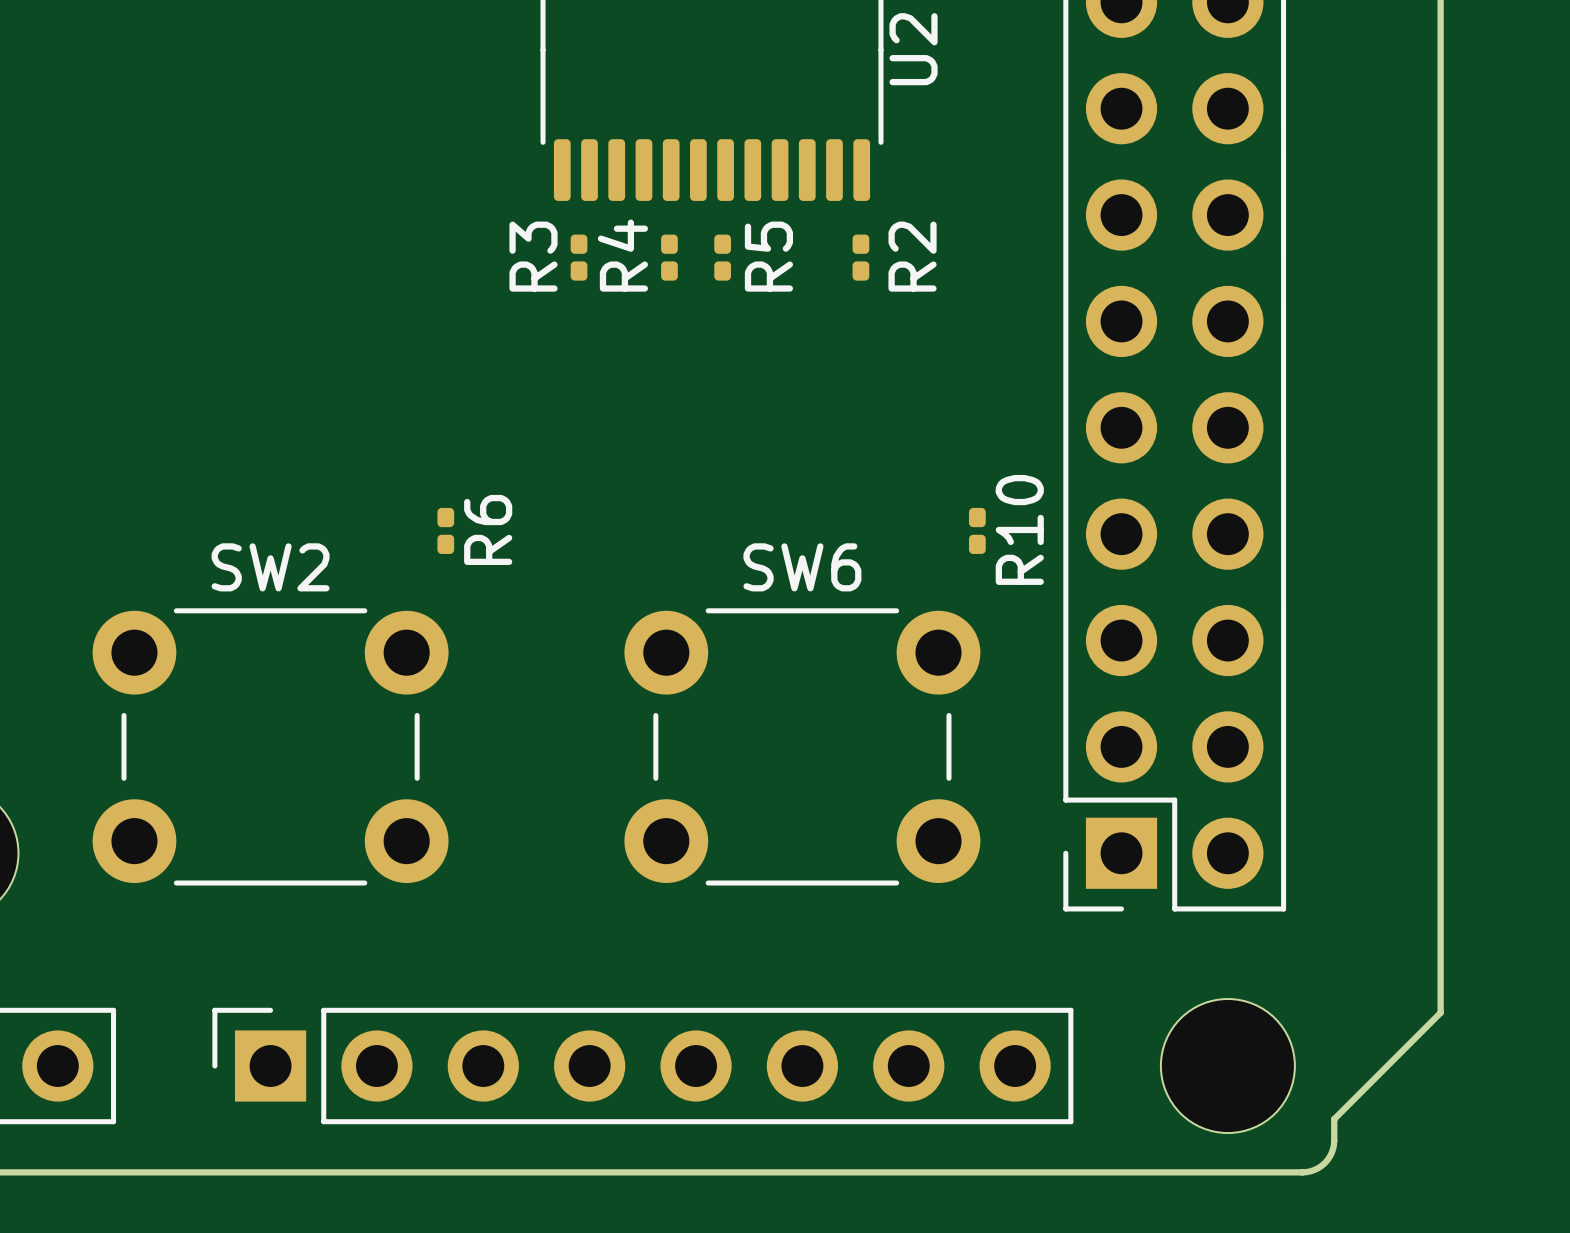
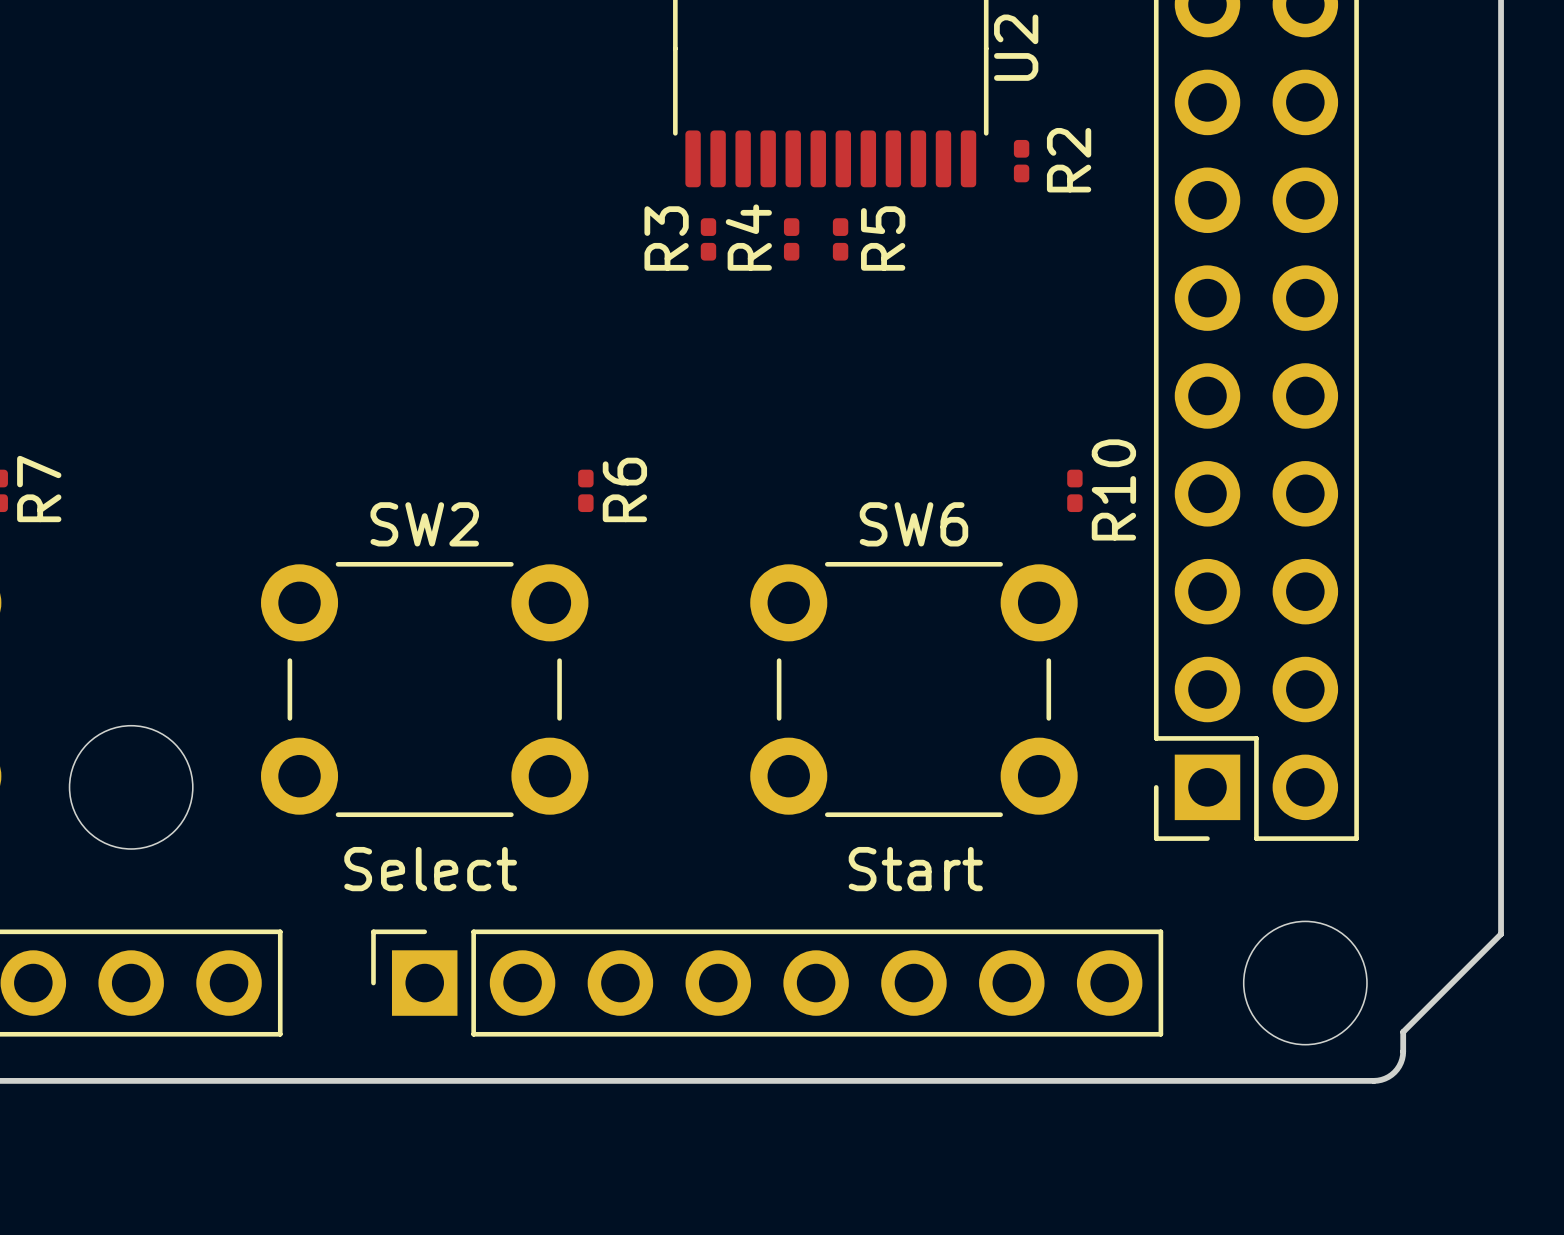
R2 position: (860, 257) -> (1021, 161)
text: none -> Select (430, 869)
text: none -> Start (915, 869)

